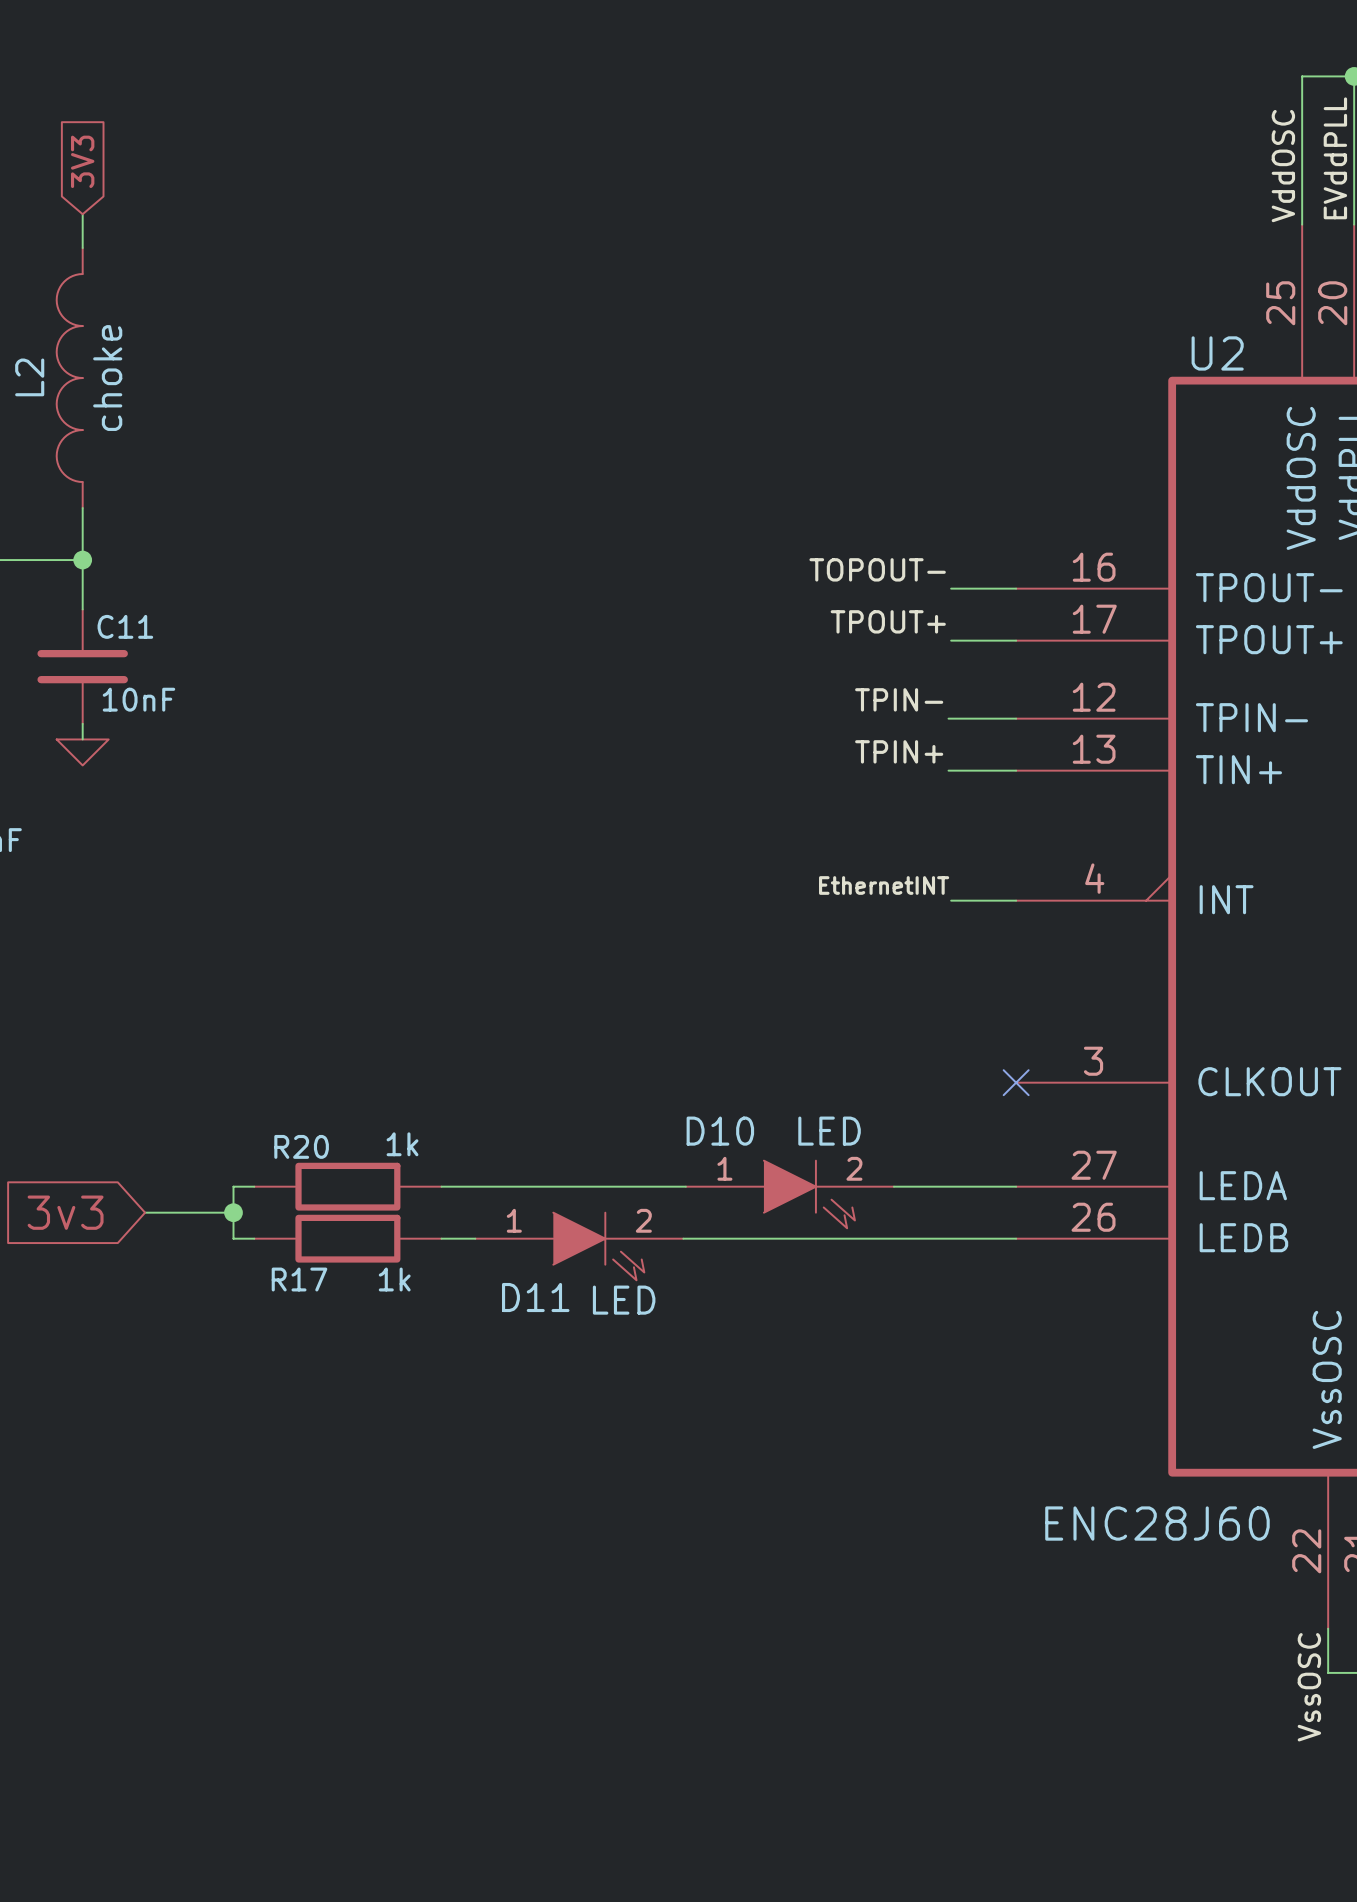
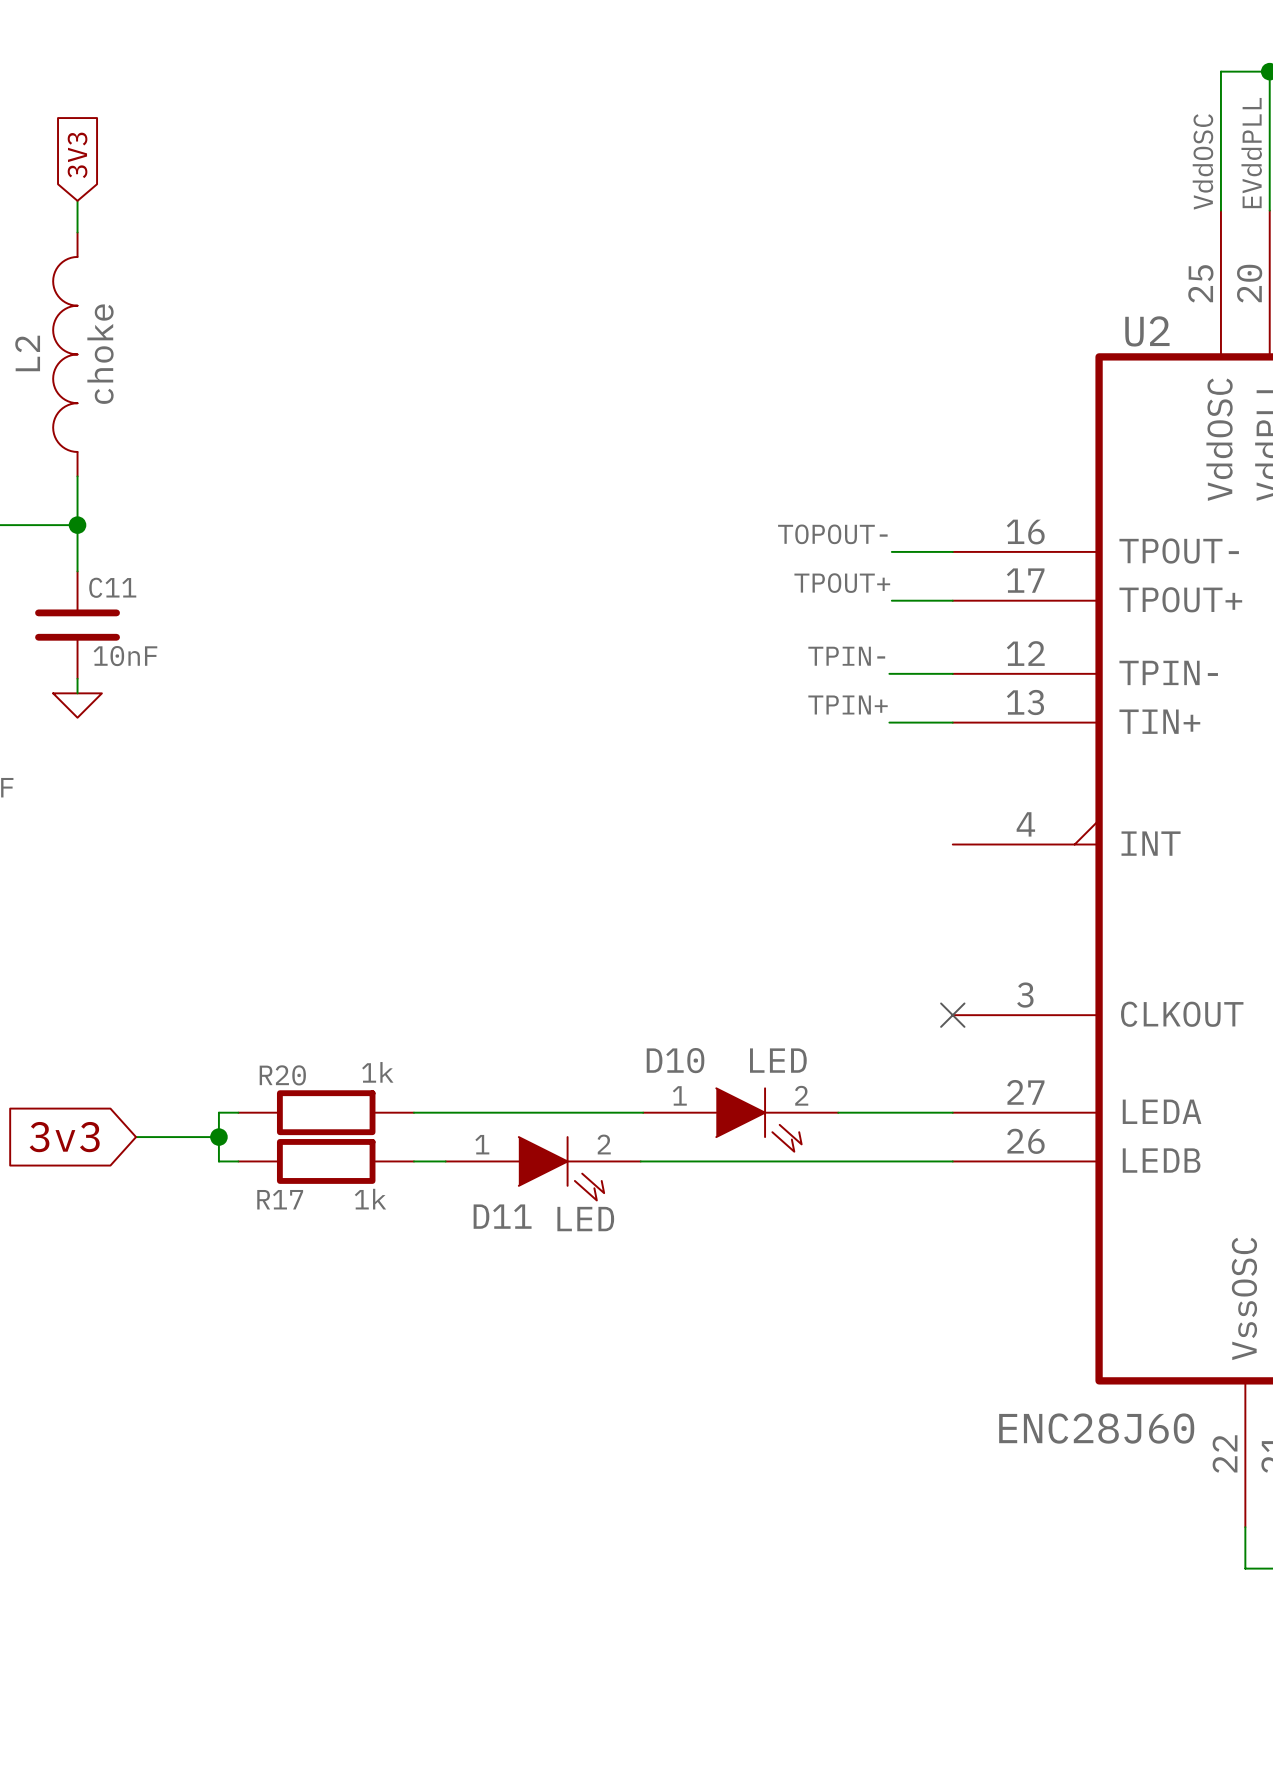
label: EthernetINT (884, 885) -> none
wire: (951, 900) (1016, 900) -> none
label: VssOSC (1309, 1687) -> none

